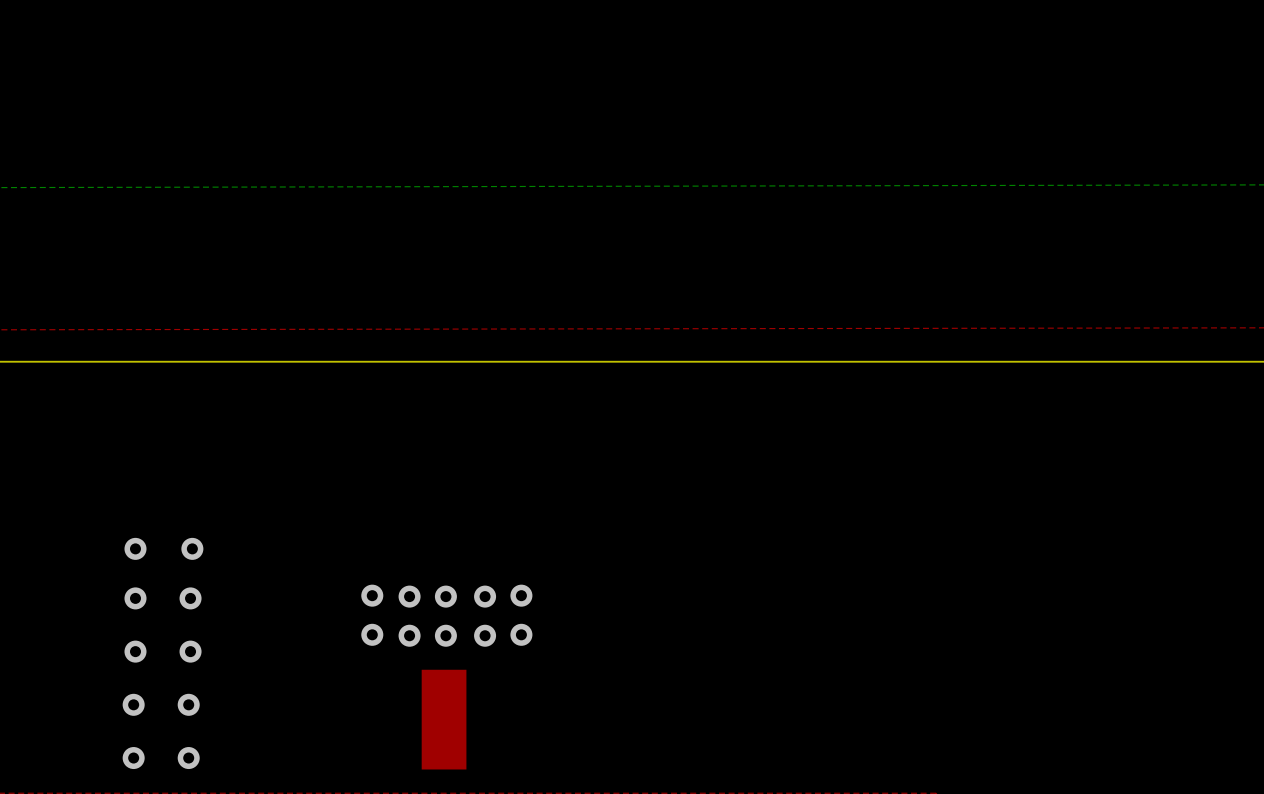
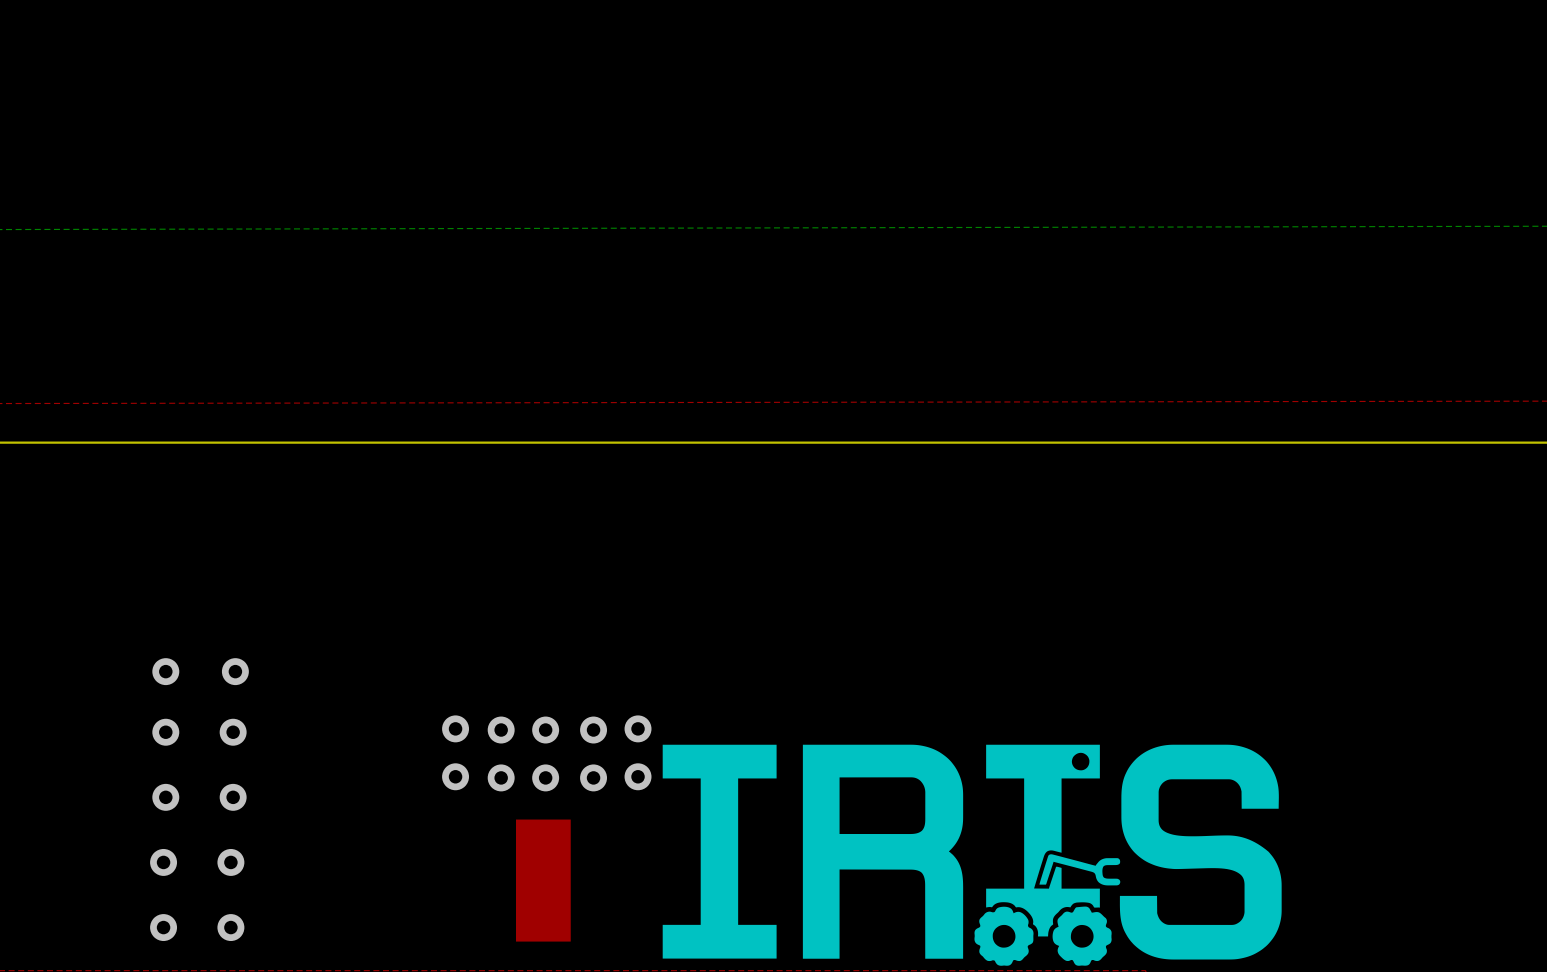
drawing: none -> [662, 744, 1282, 966]

